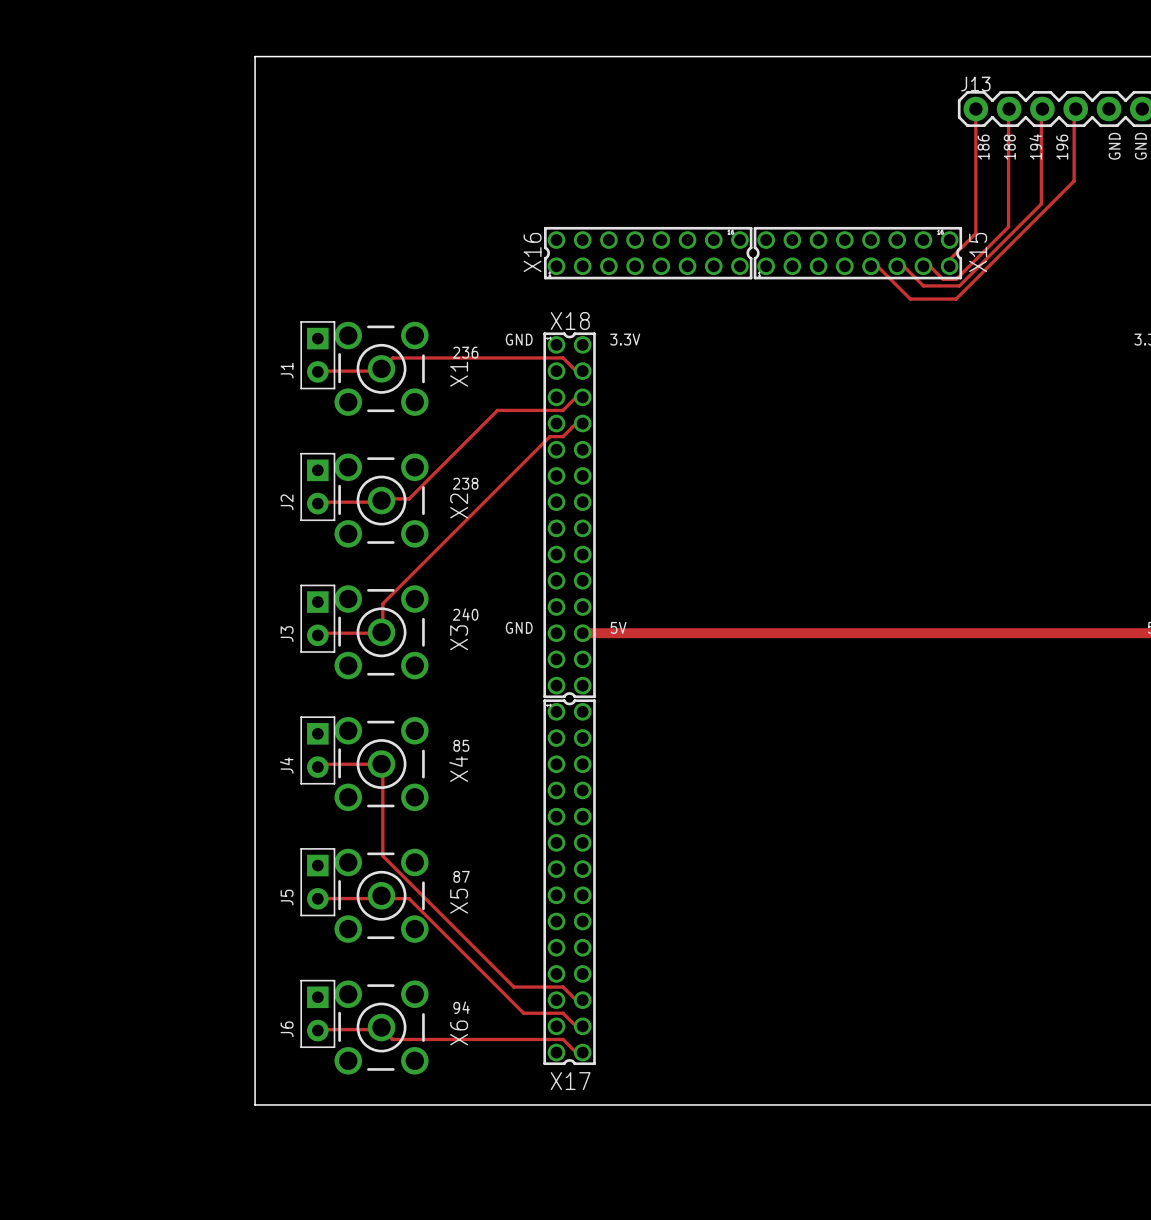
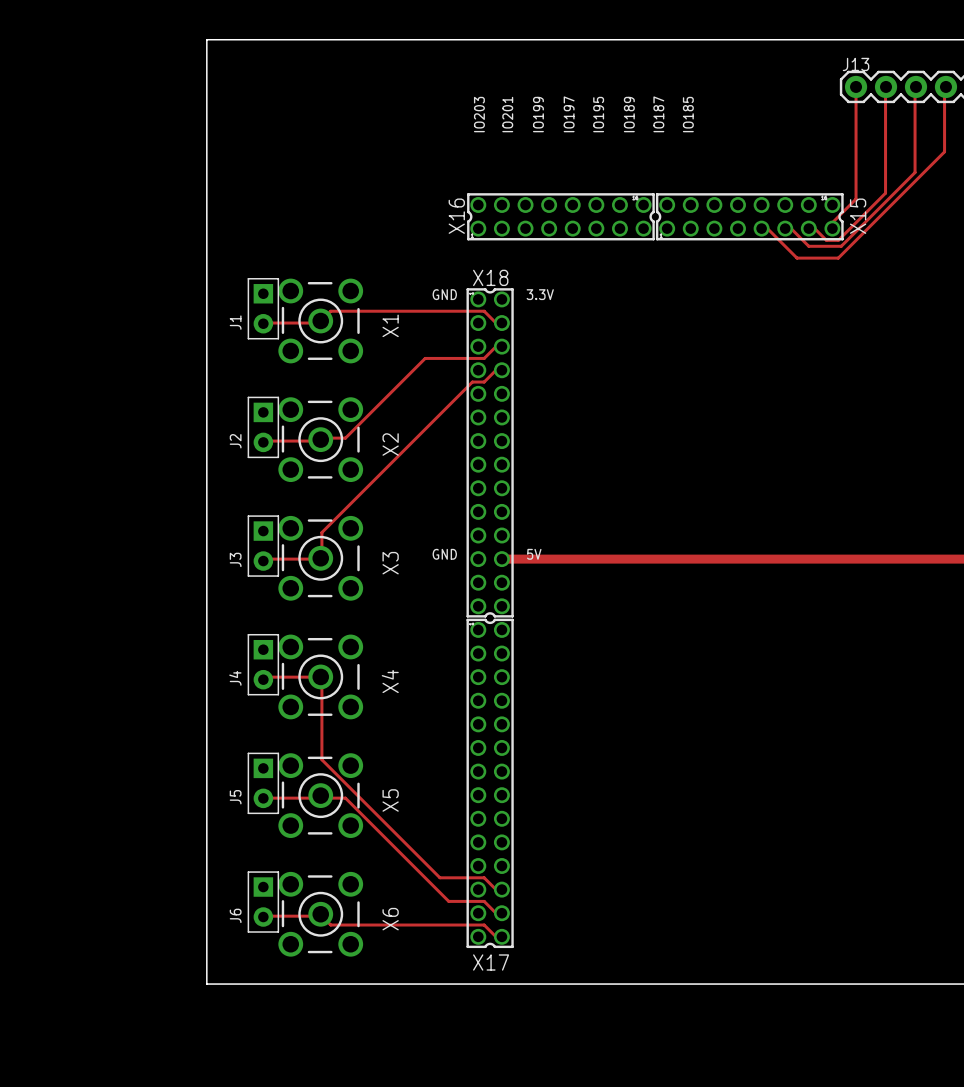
text: none -> IO203 (479, 114)
text: none -> IO201 (507, 114)
text: none -> IO199 (538, 114)
text: none -> IO197 (569, 114)
text: none -> IO195 (598, 114)
text: none -> IO189 (629, 114)
text: none -> IO187 (658, 114)
text: none -> IO185 (688, 114)
text: 194 (1035, 146) -> none
text: 186 (983, 147) -> none
text: 188 (1009, 147) -> none
text: 196 (1062, 147) -> none
text: 236 (465, 352) -> none
text: 238 (465, 483) -> none
text: 240 (465, 614) -> none
text: 85 (461, 745) -> none
text: 87 (461, 876) -> none
text: 94 (461, 1007) -> none

